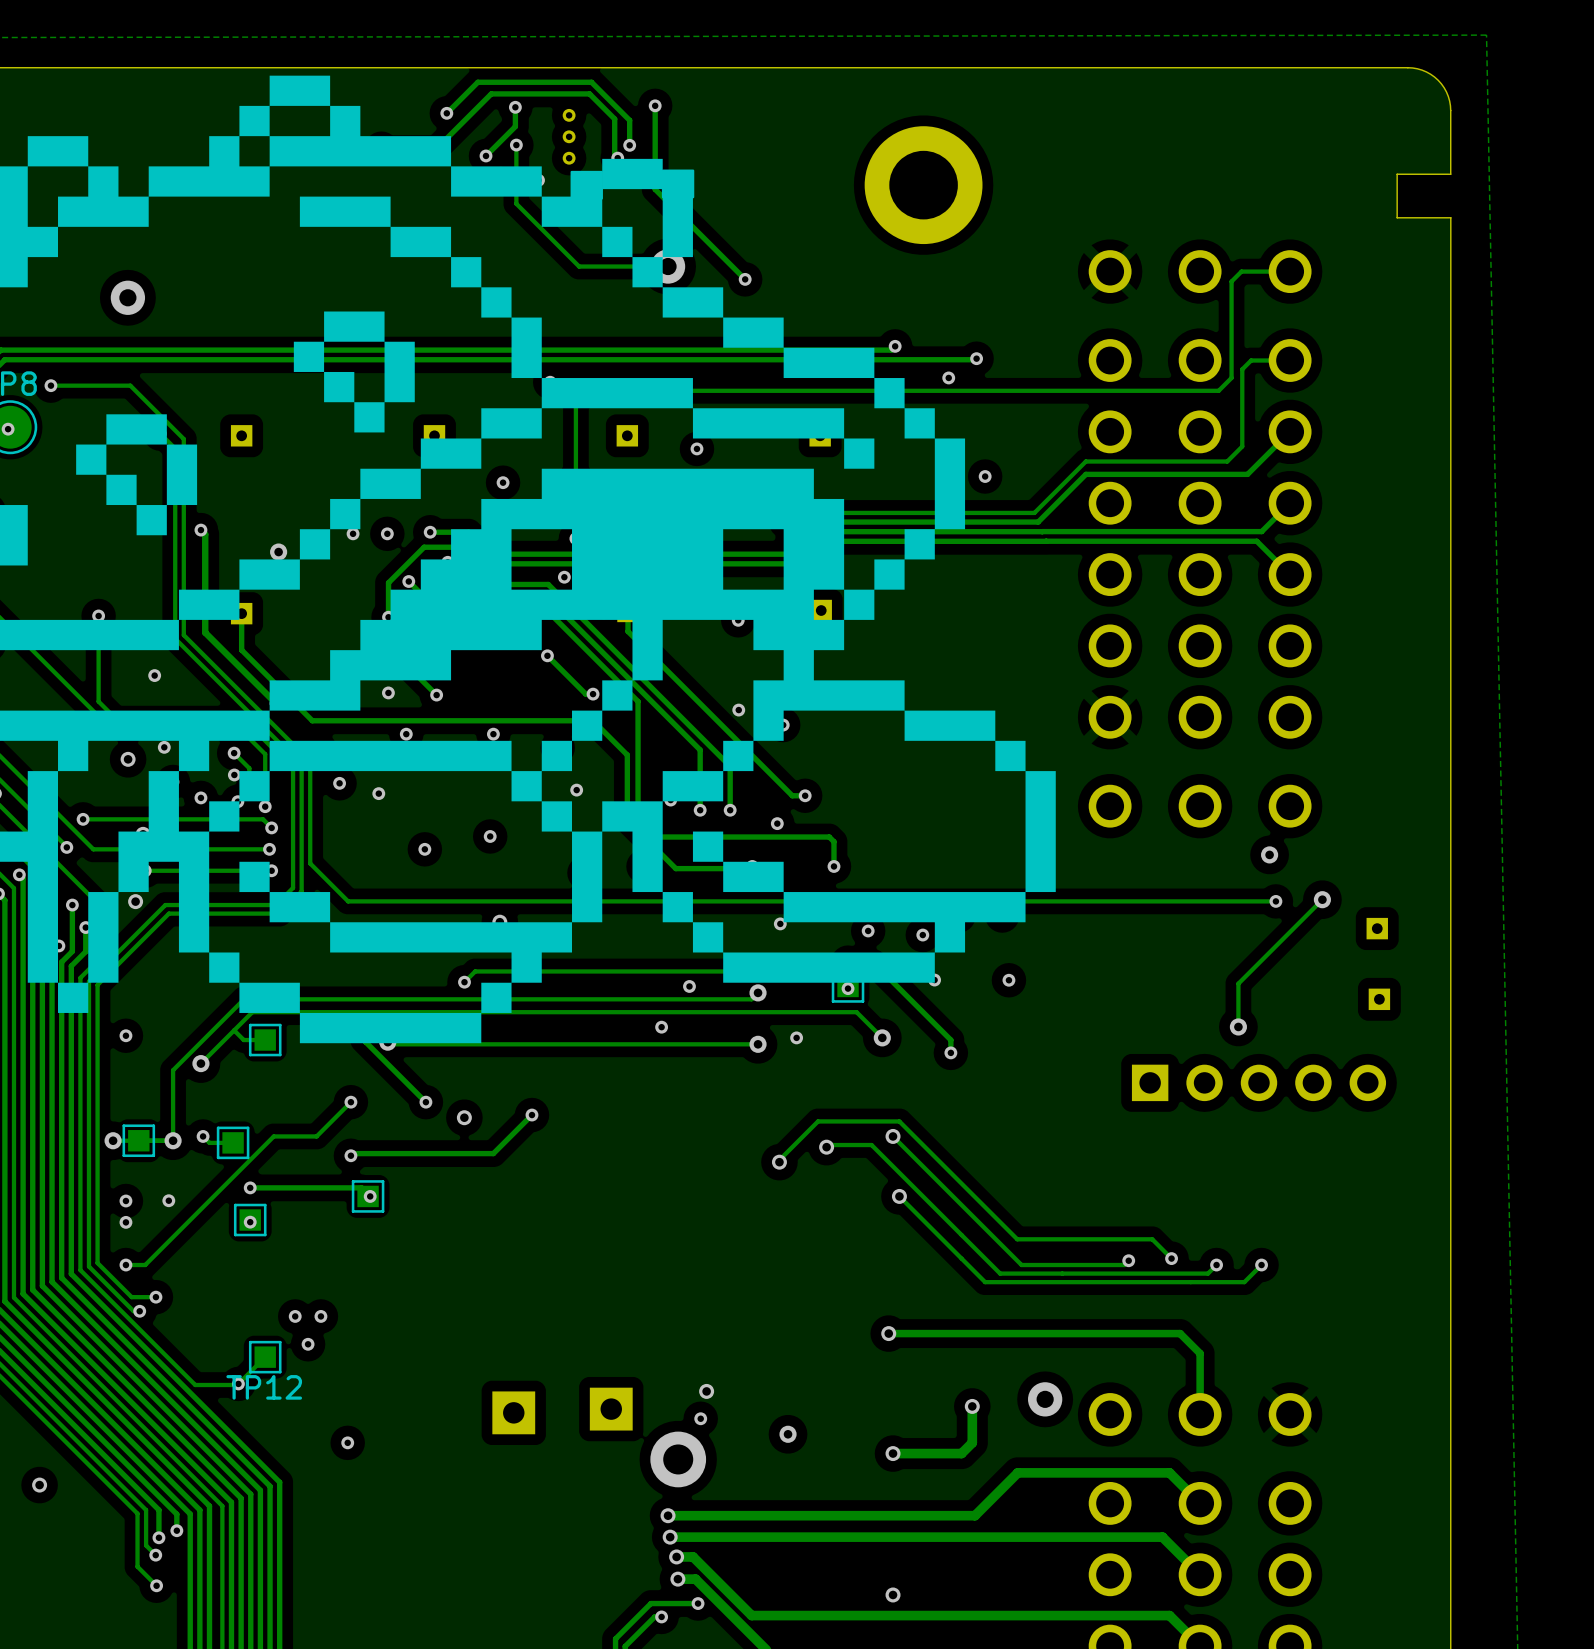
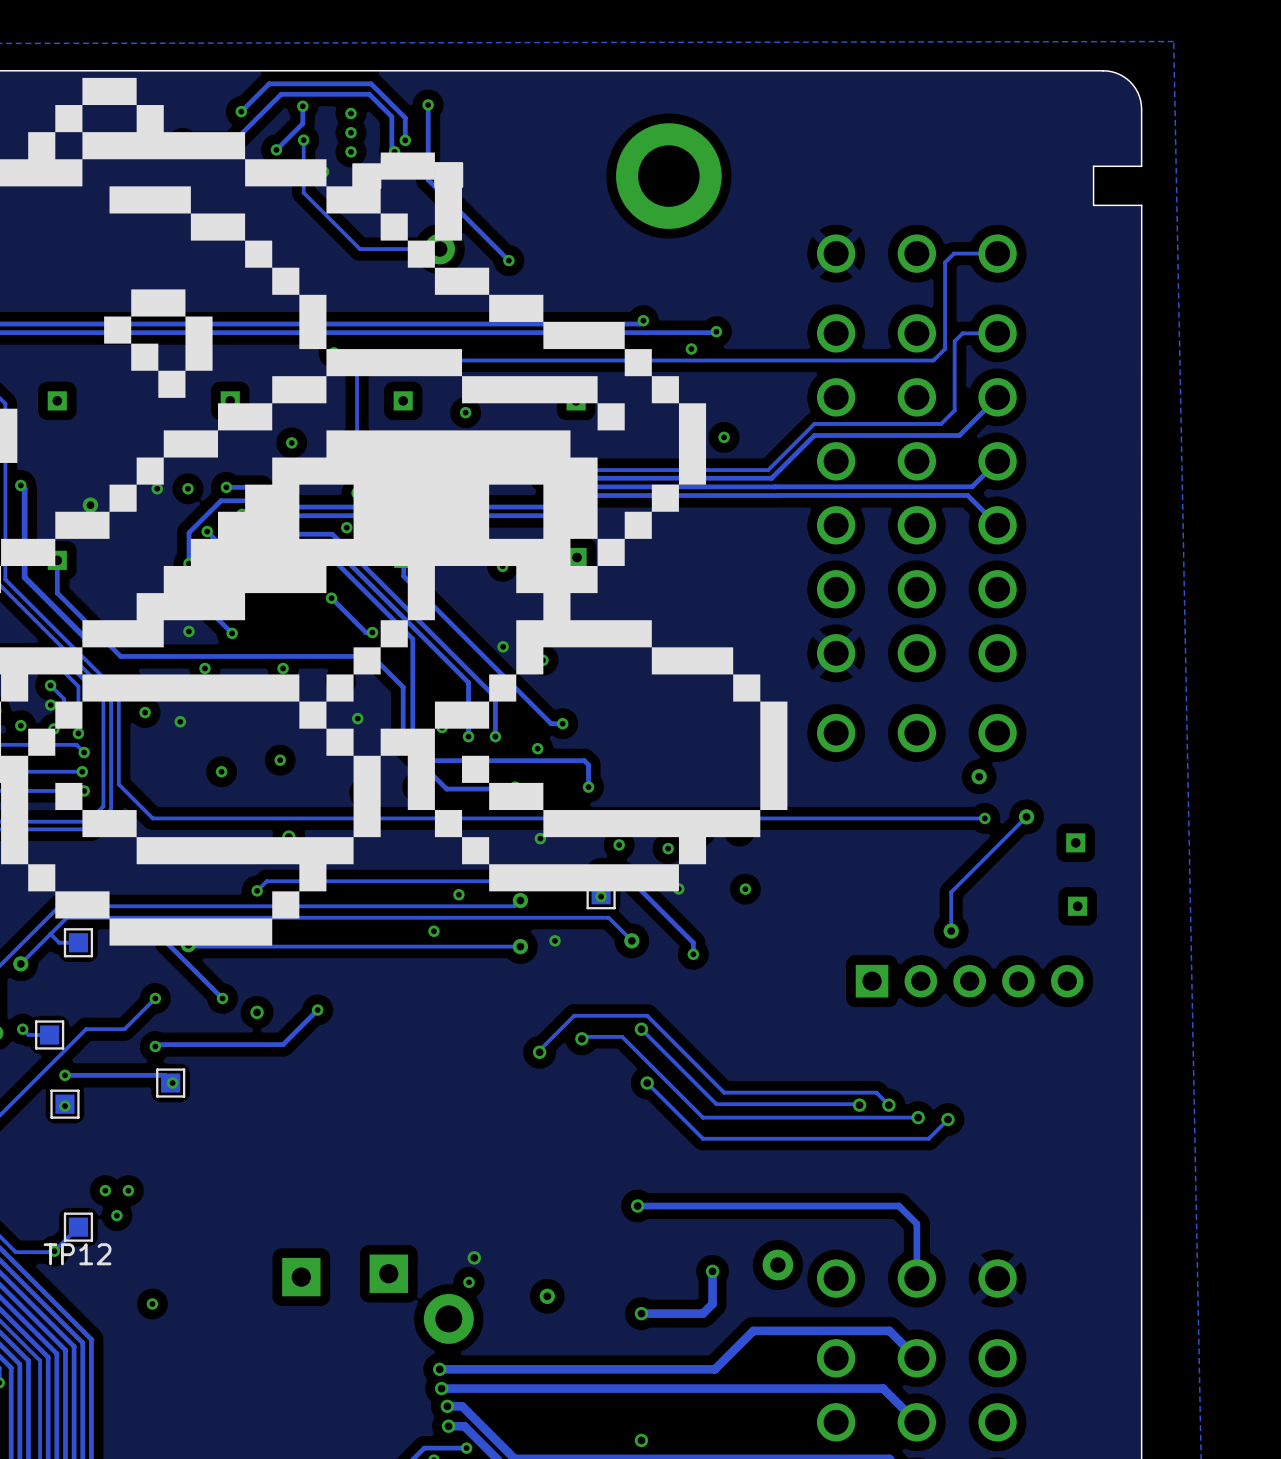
track: (985, 1207) (1017, 1239) (1152, 1239) (1171, 1258) -> (724, 1092) (876, 1092) (888, 1105)
track: (976, 1220) (1021, 1265) (1124, 1265) (1128, 1260) -> (716, 1104) (859, 1105)
via: none -> (859, 1105)
via: none -> (888, 1105)
track: (961, 1235) (1000, 1273) (1207, 1273) (1216, 1265) -> (702, 1117) (918, 1117)
via: none -> (918, 1117)
via: none -> (947, 1119)
track: (961, 1258) (985, 1282) (1244, 1282) (1261, 1265) -> (702, 1138) (928, 1138) (947, 1119)
via: (1171, 1258) -> none
via: (1128, 1260) -> none
via: (1216, 1265) -> none
via: (1261, 1265) -> none

